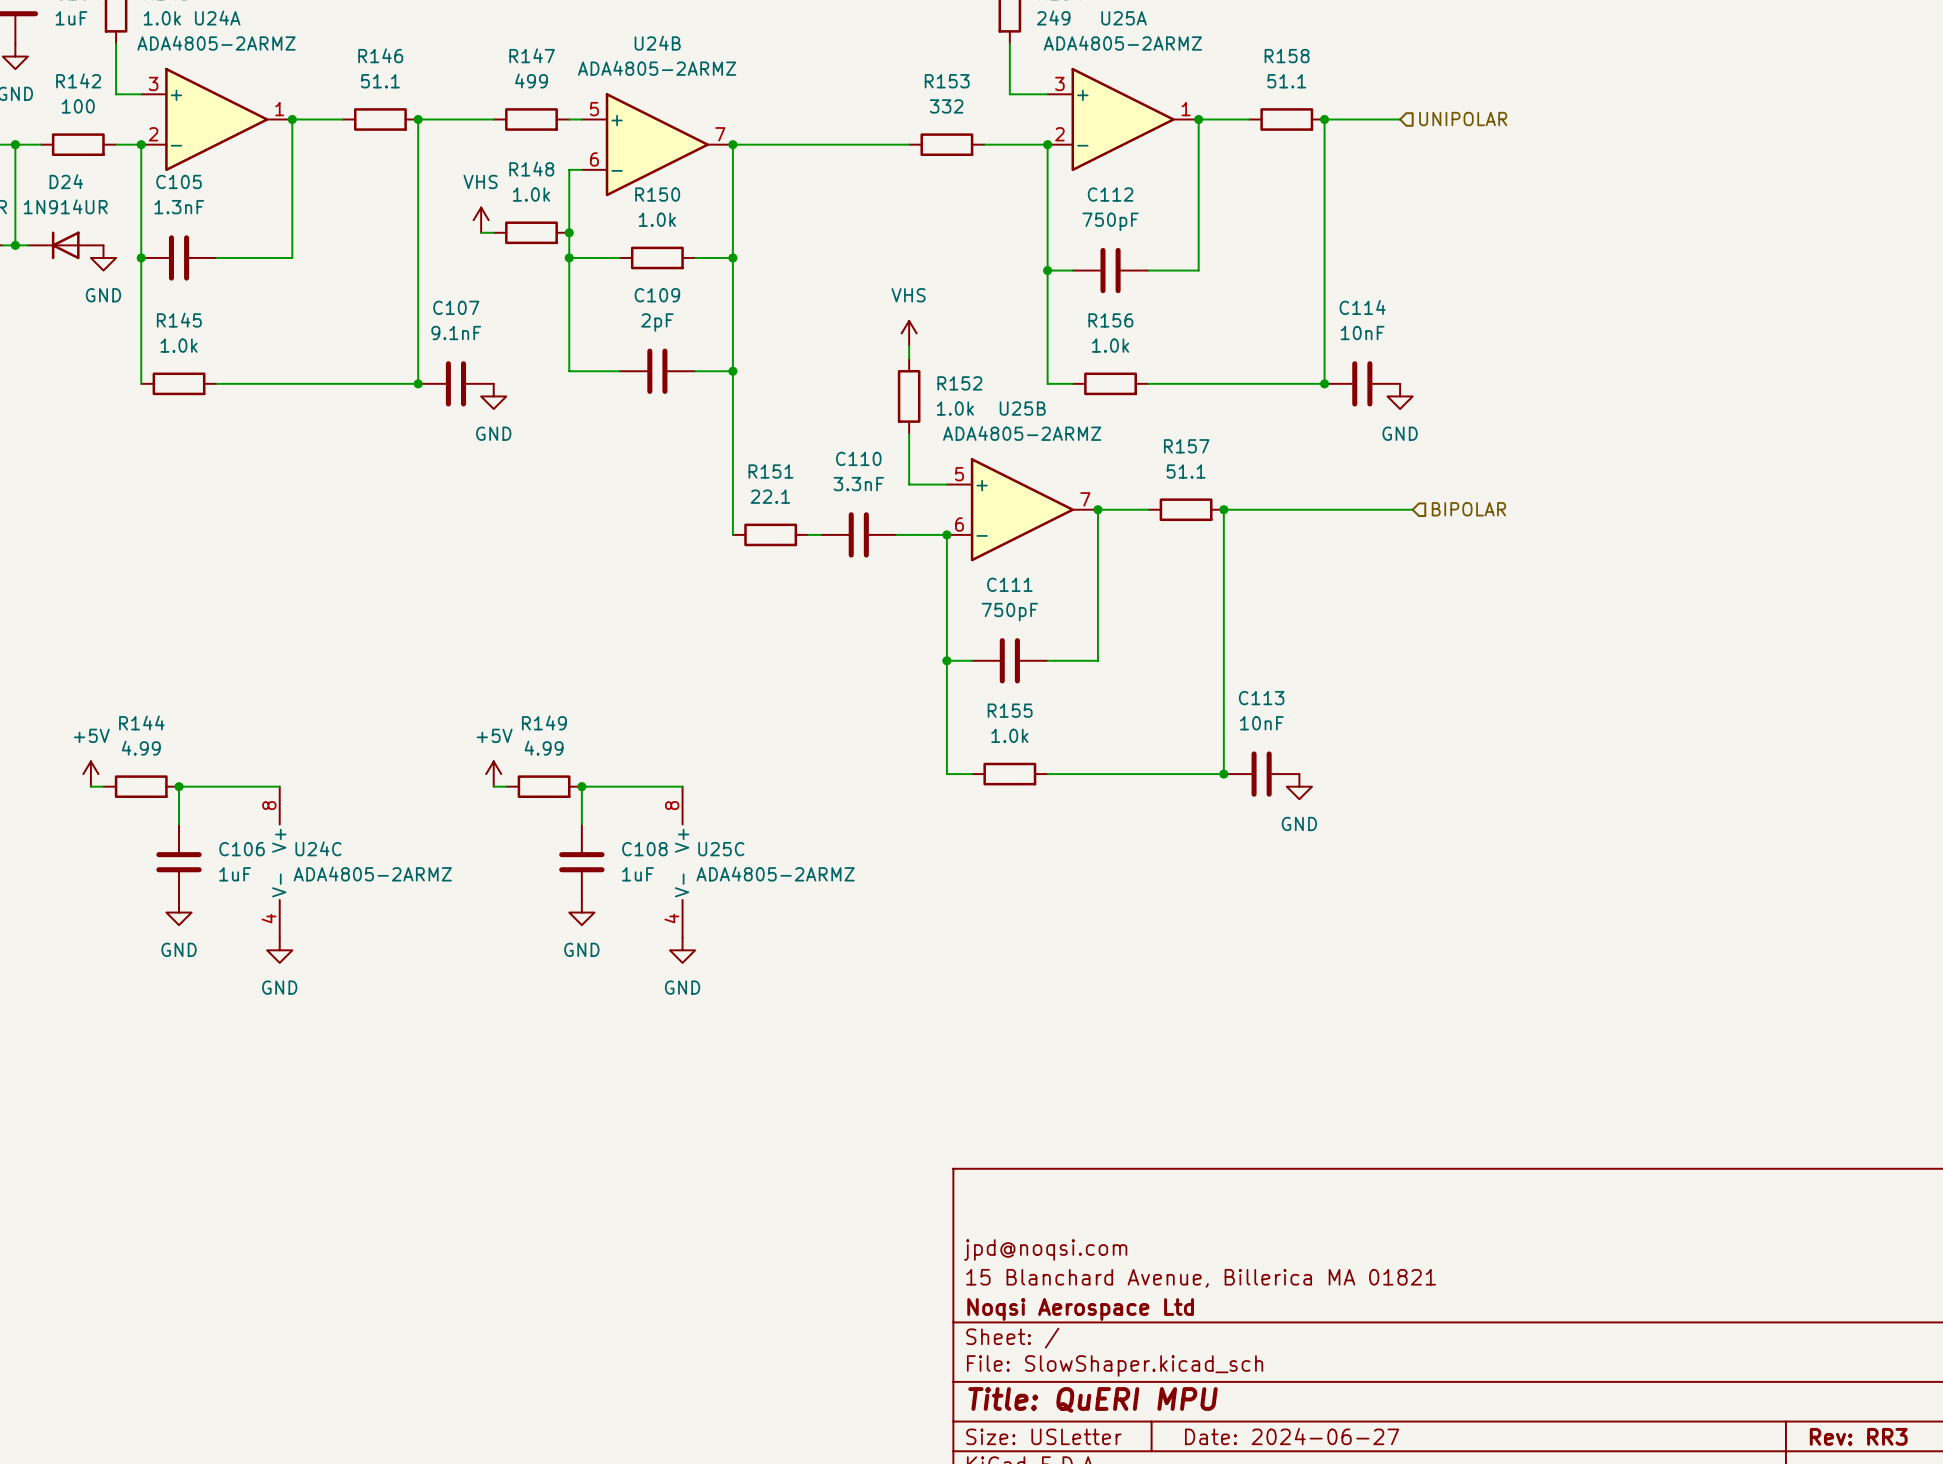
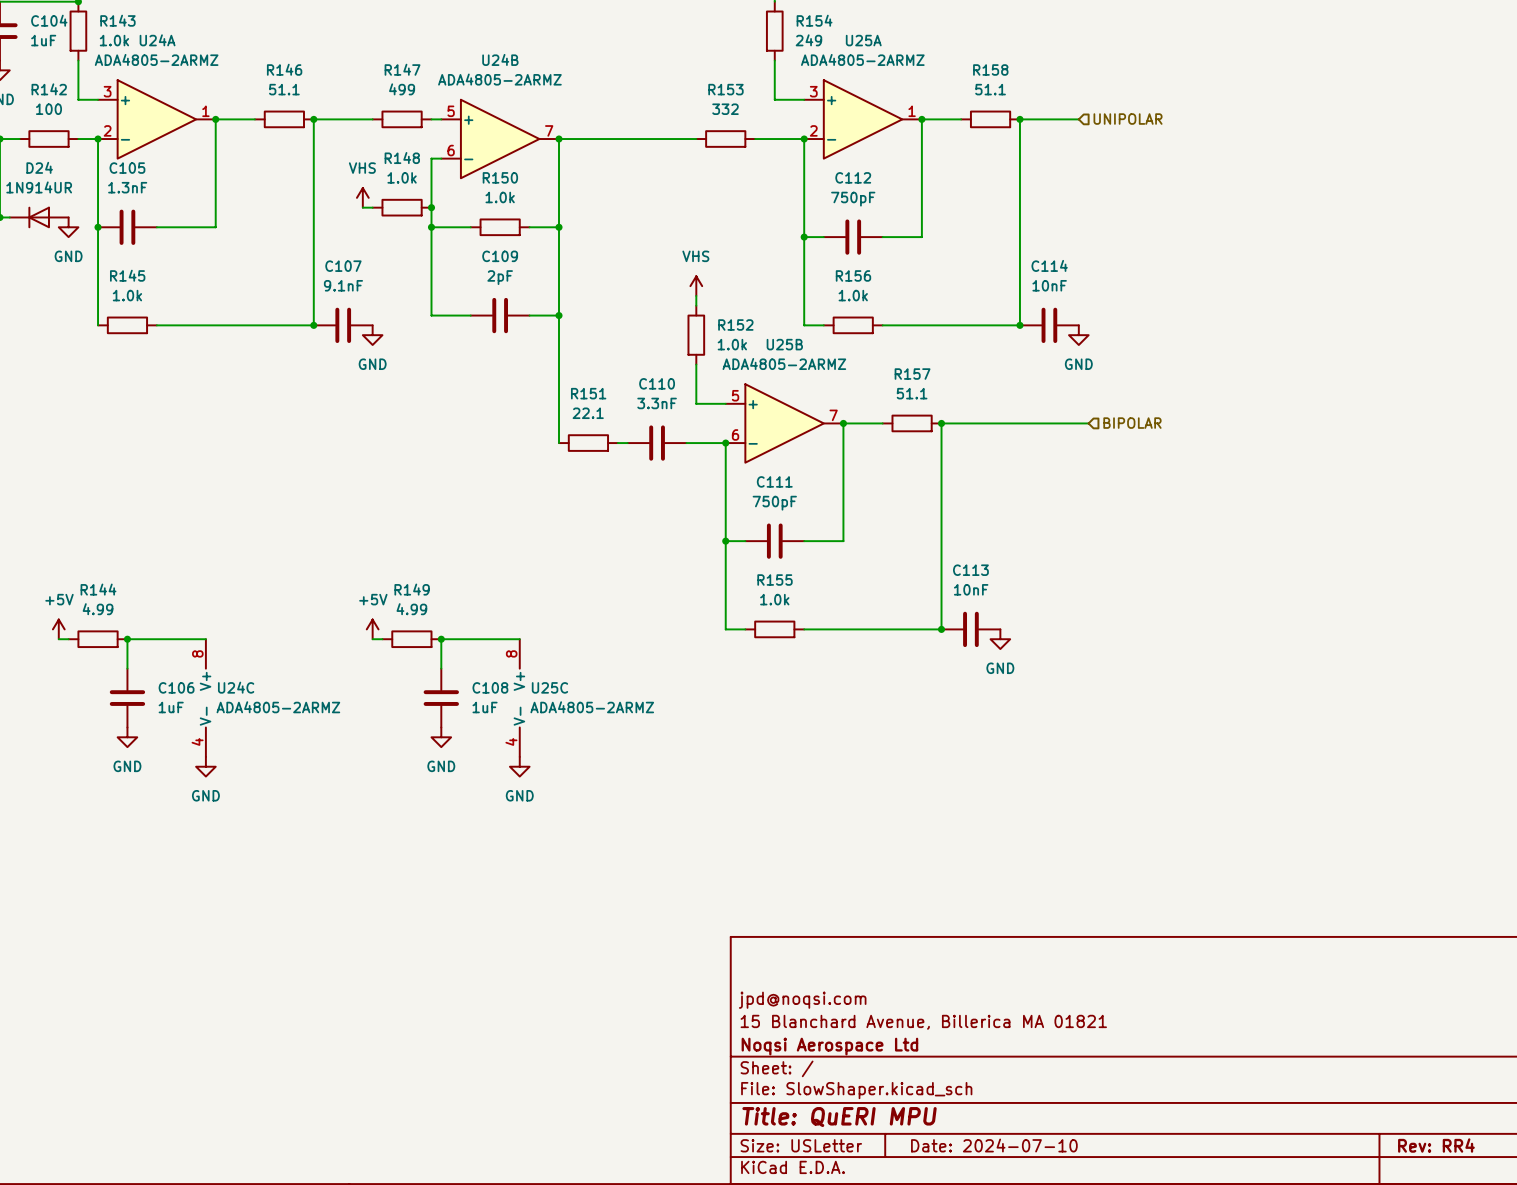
title block: Date: 2024-06-27 (1292, 1436) -> Date: 2024-07-10 (994, 1145)
title block: Rev: RR3 (1858, 1436) -> Rev: RR4 (1436, 1145)

